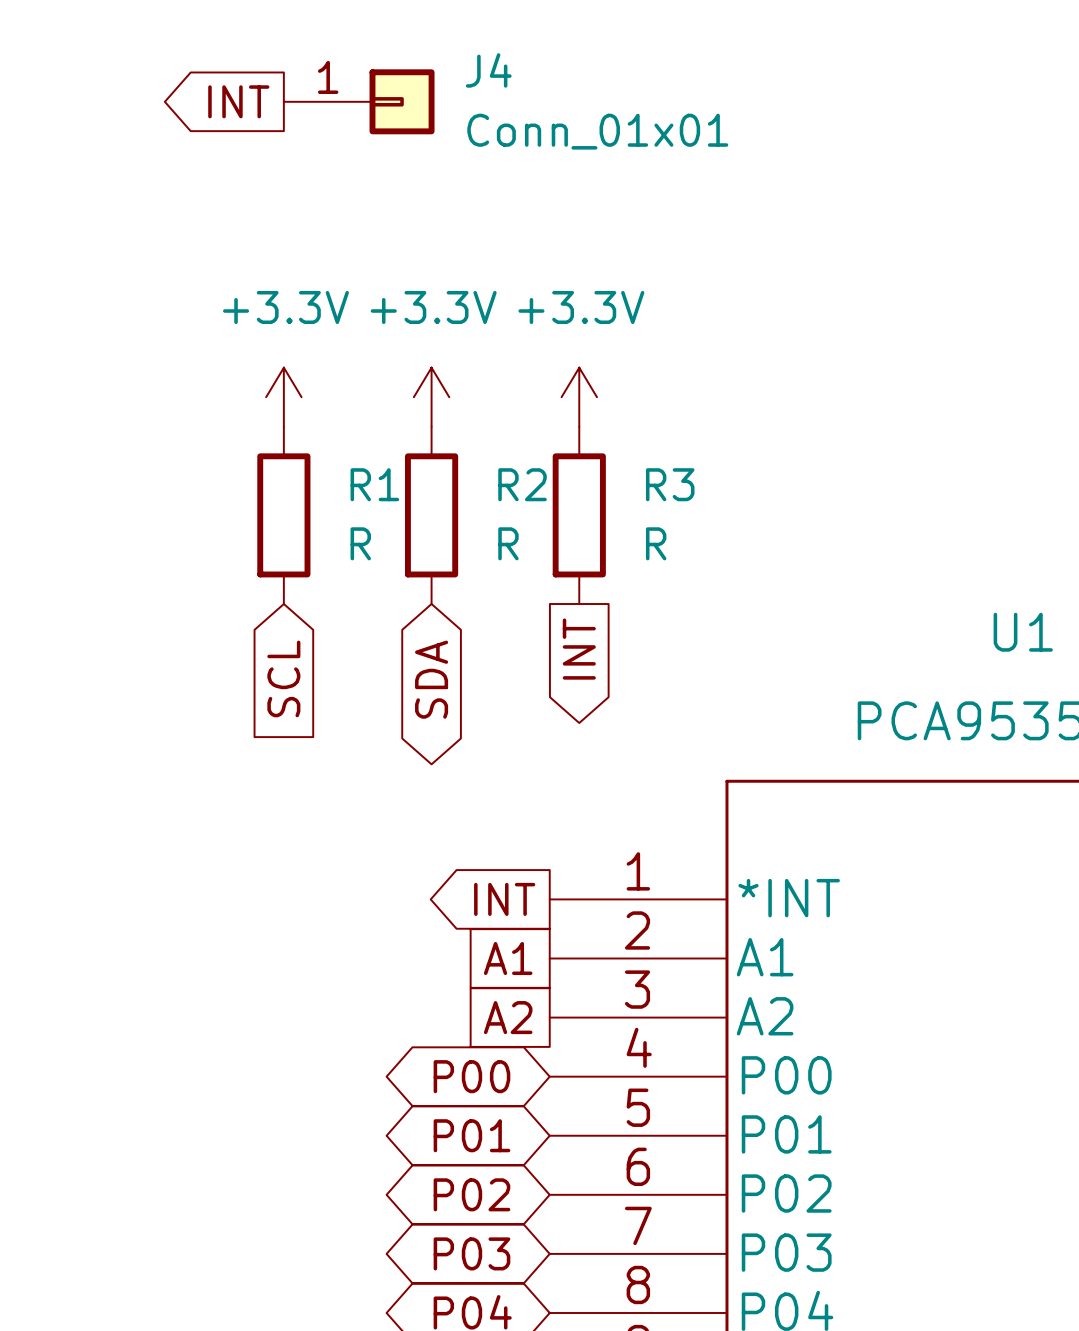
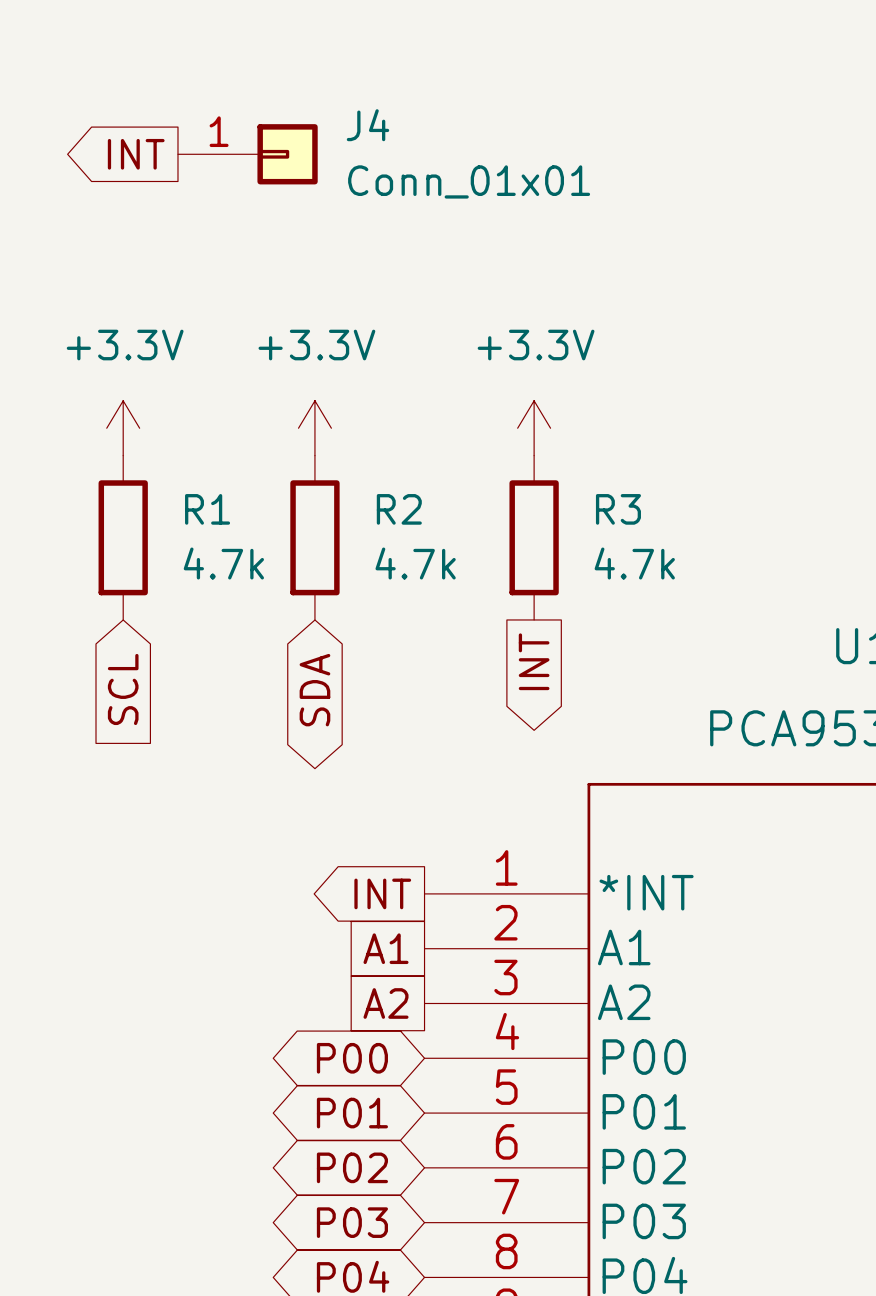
power symbol position: +3.3V (283, 397) -> +3.3V (123, 428)
power symbol position: +3.3V (579, 397) -> +3.3V (534, 428)
R1 position: (283, 515) -> (123, 537)
R3 position: (579, 515) -> (534, 537)
R1 value: R (360, 543) -> 4.7k (223, 563)
R2 value: R (508, 543) -> 4.7k (415, 563)
R3 value: R (656, 543) -> 4.7k (634, 563)
global label position: INT (579, 649) -> INT (534, 661)
global label position: SCL (283, 678) -> SCL (123, 689)

